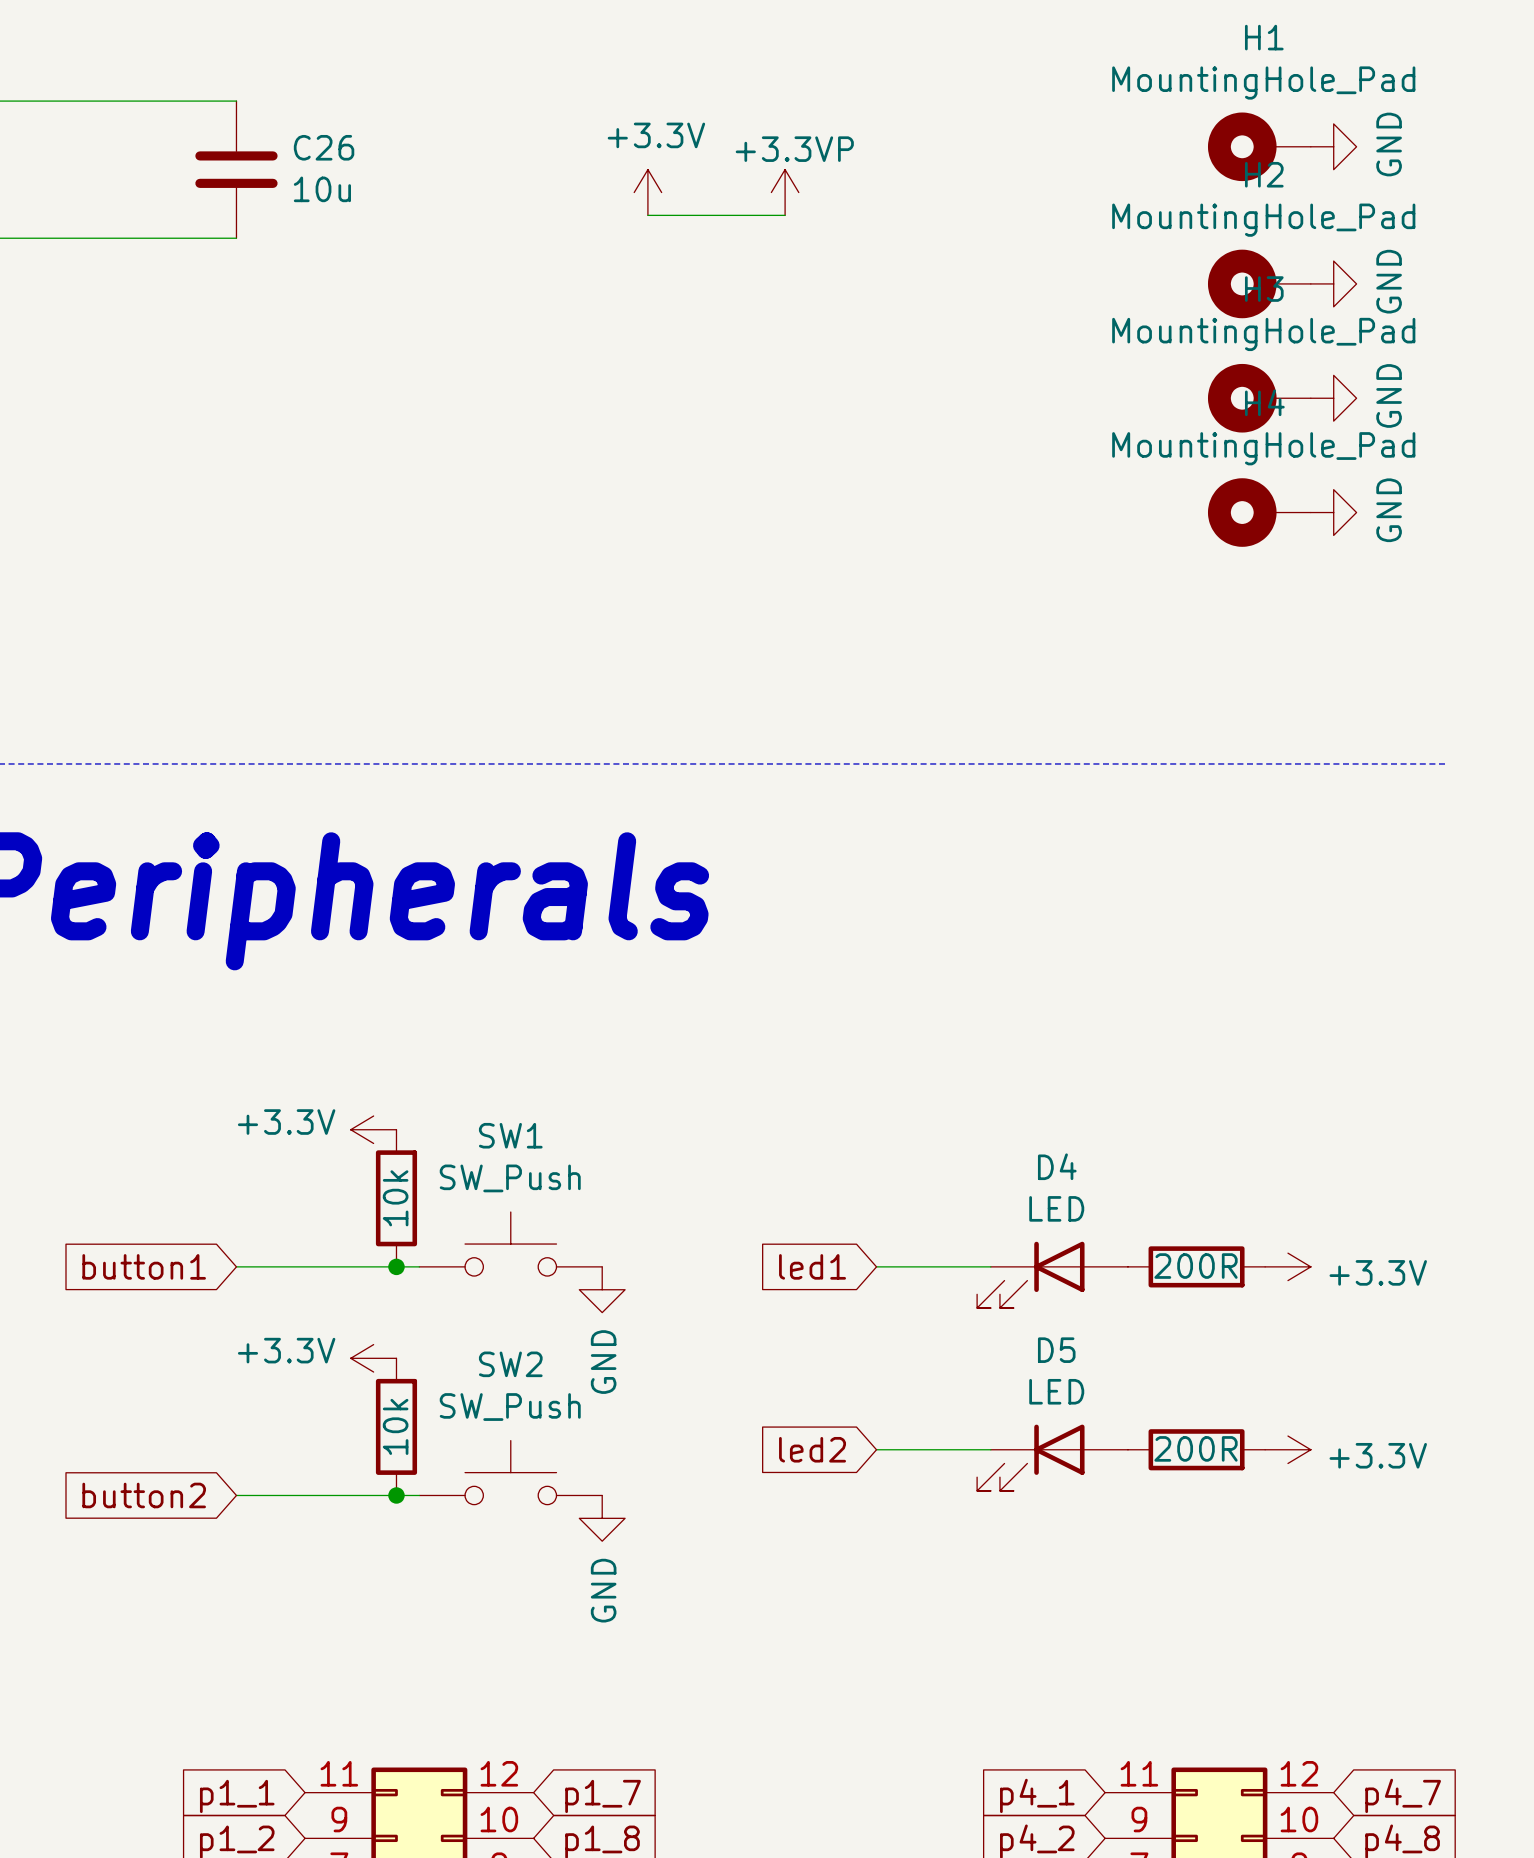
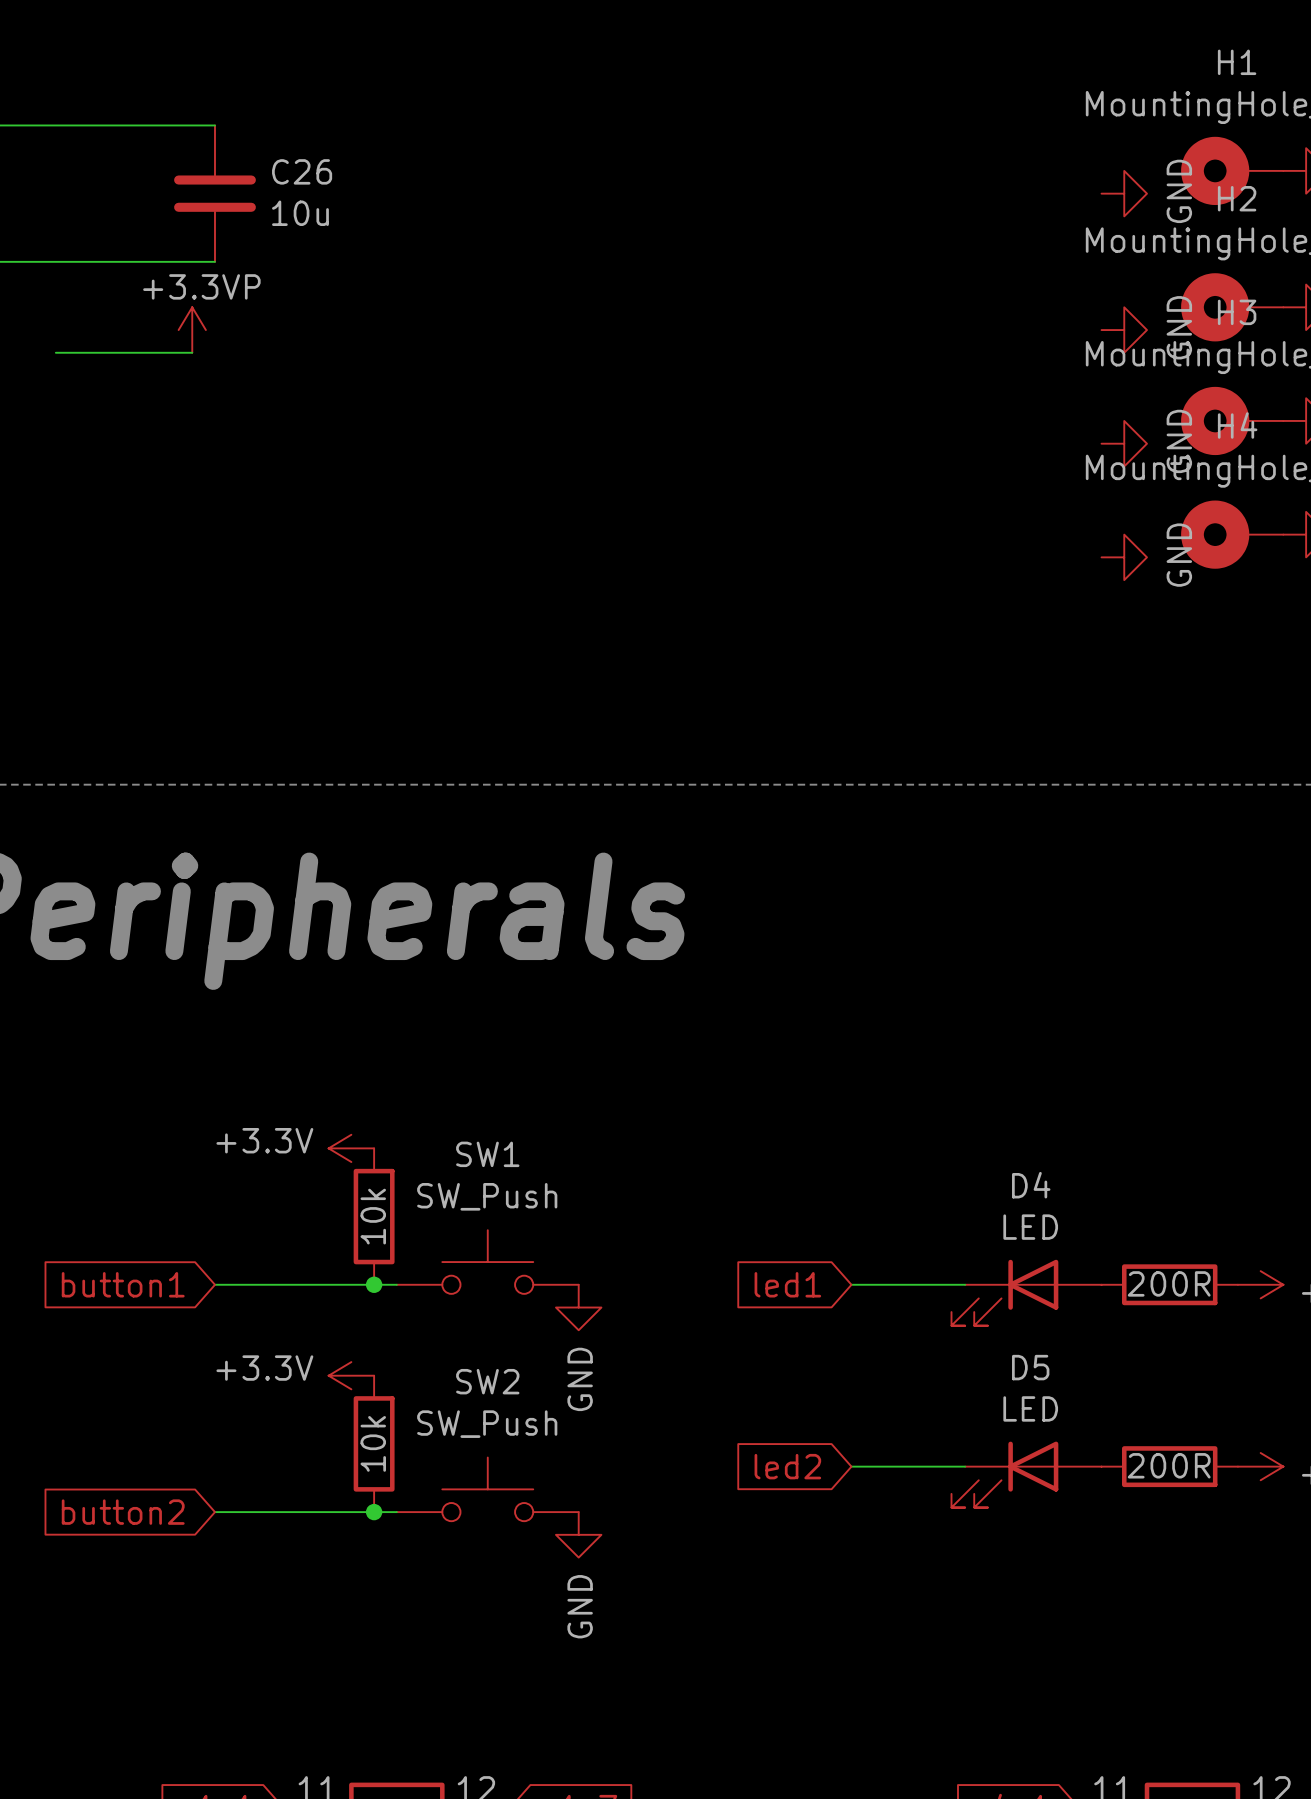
power symbol: none -> GND (1124, 193)
power symbol: +3.3V (647, 192) -> none
power symbol: +3.3VP (785, 192) -> none
wire: (647, 215) (785, 215) -> none
power symbol: none -> +3.3VP (192, 330)
power symbol: none -> GND (1124, 330)
wire: none -> (55, 352) (192, 352)
power symbol: none -> GND (1124, 443)
power symbol: none -> GND (1124, 557)

